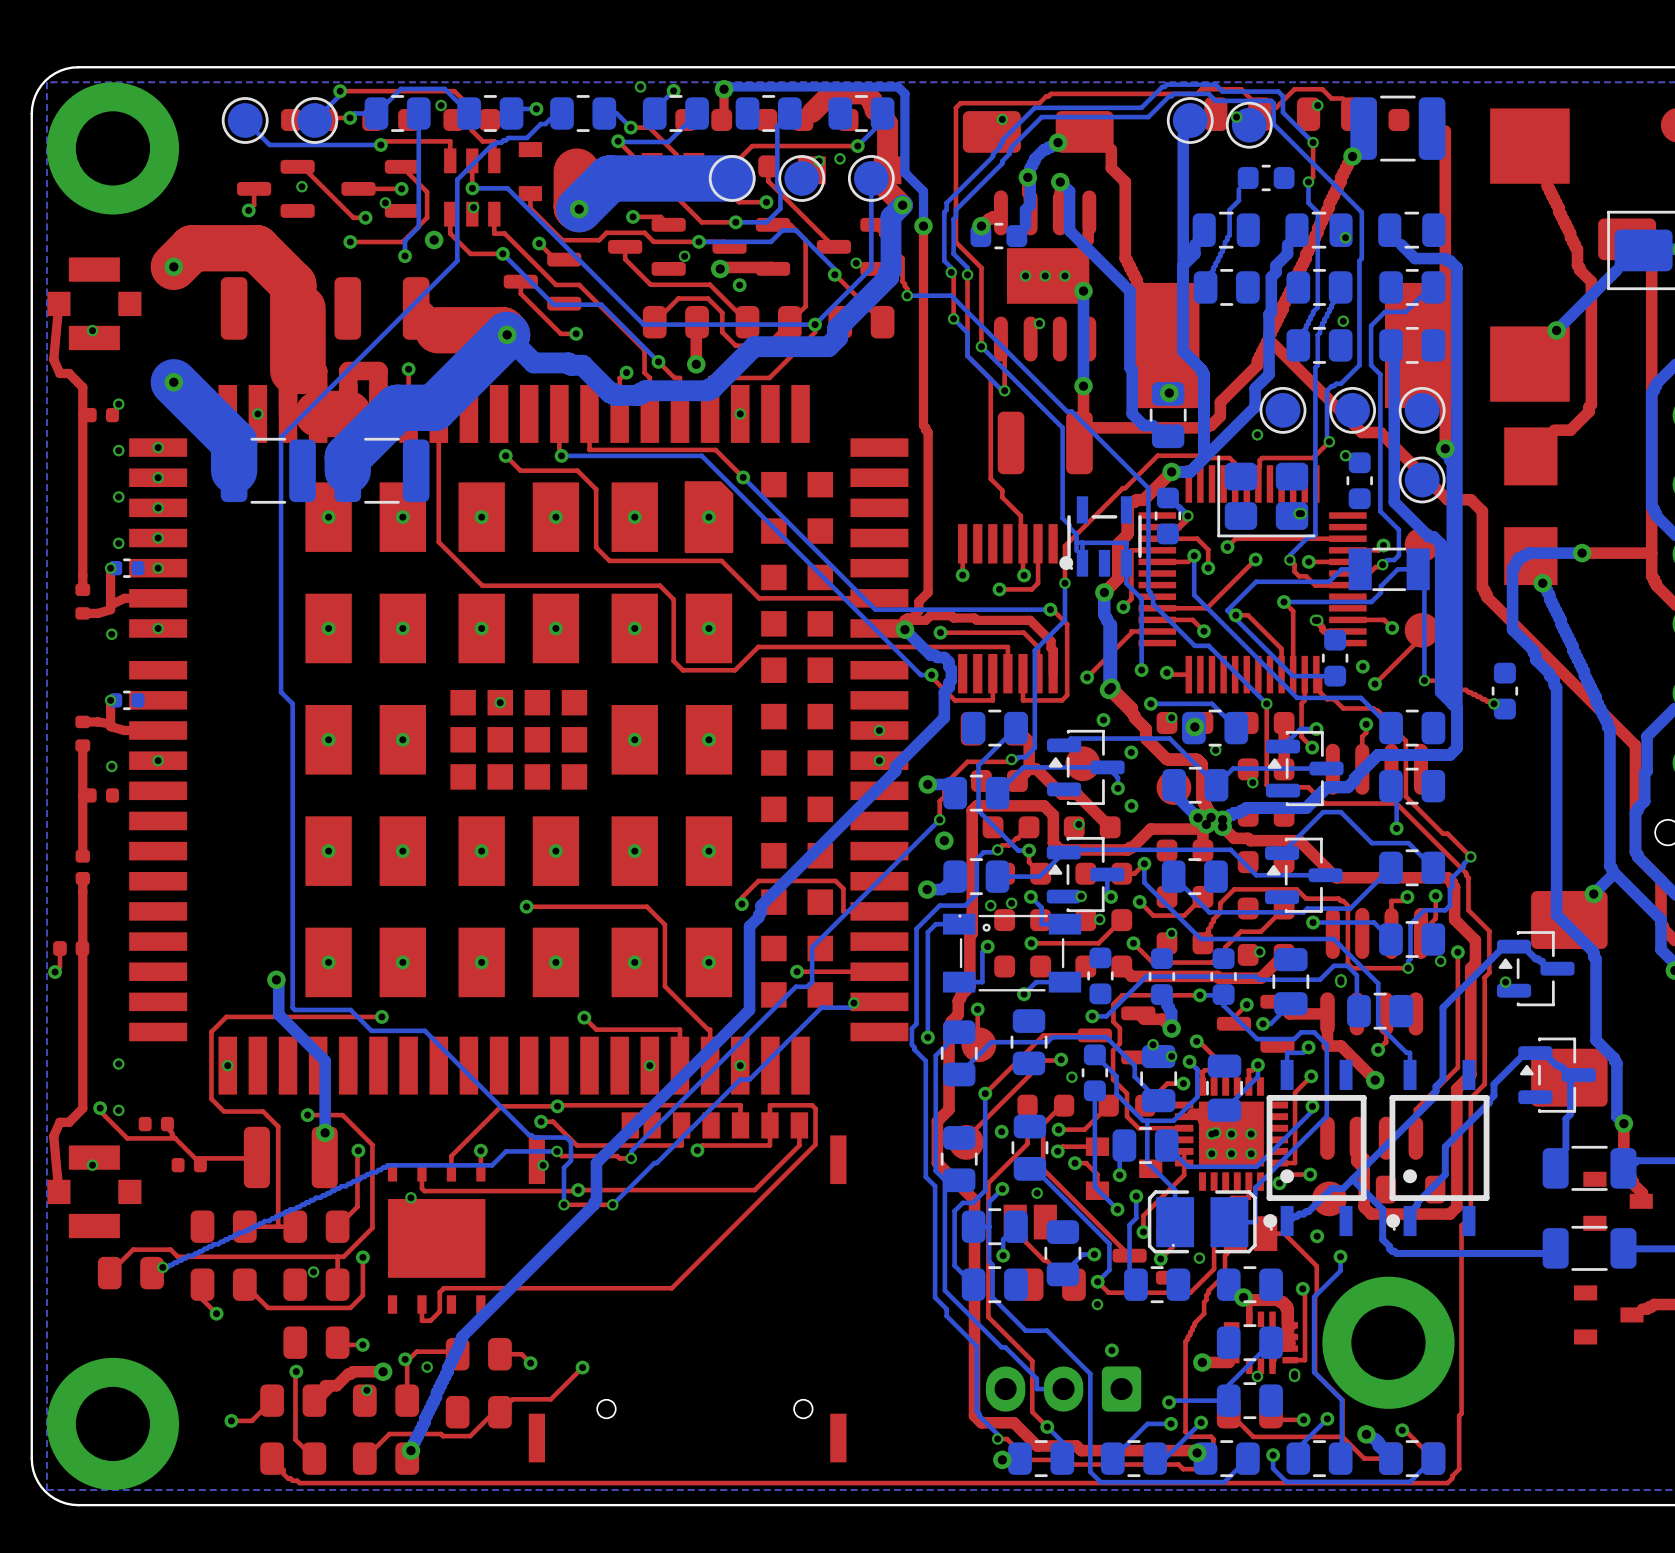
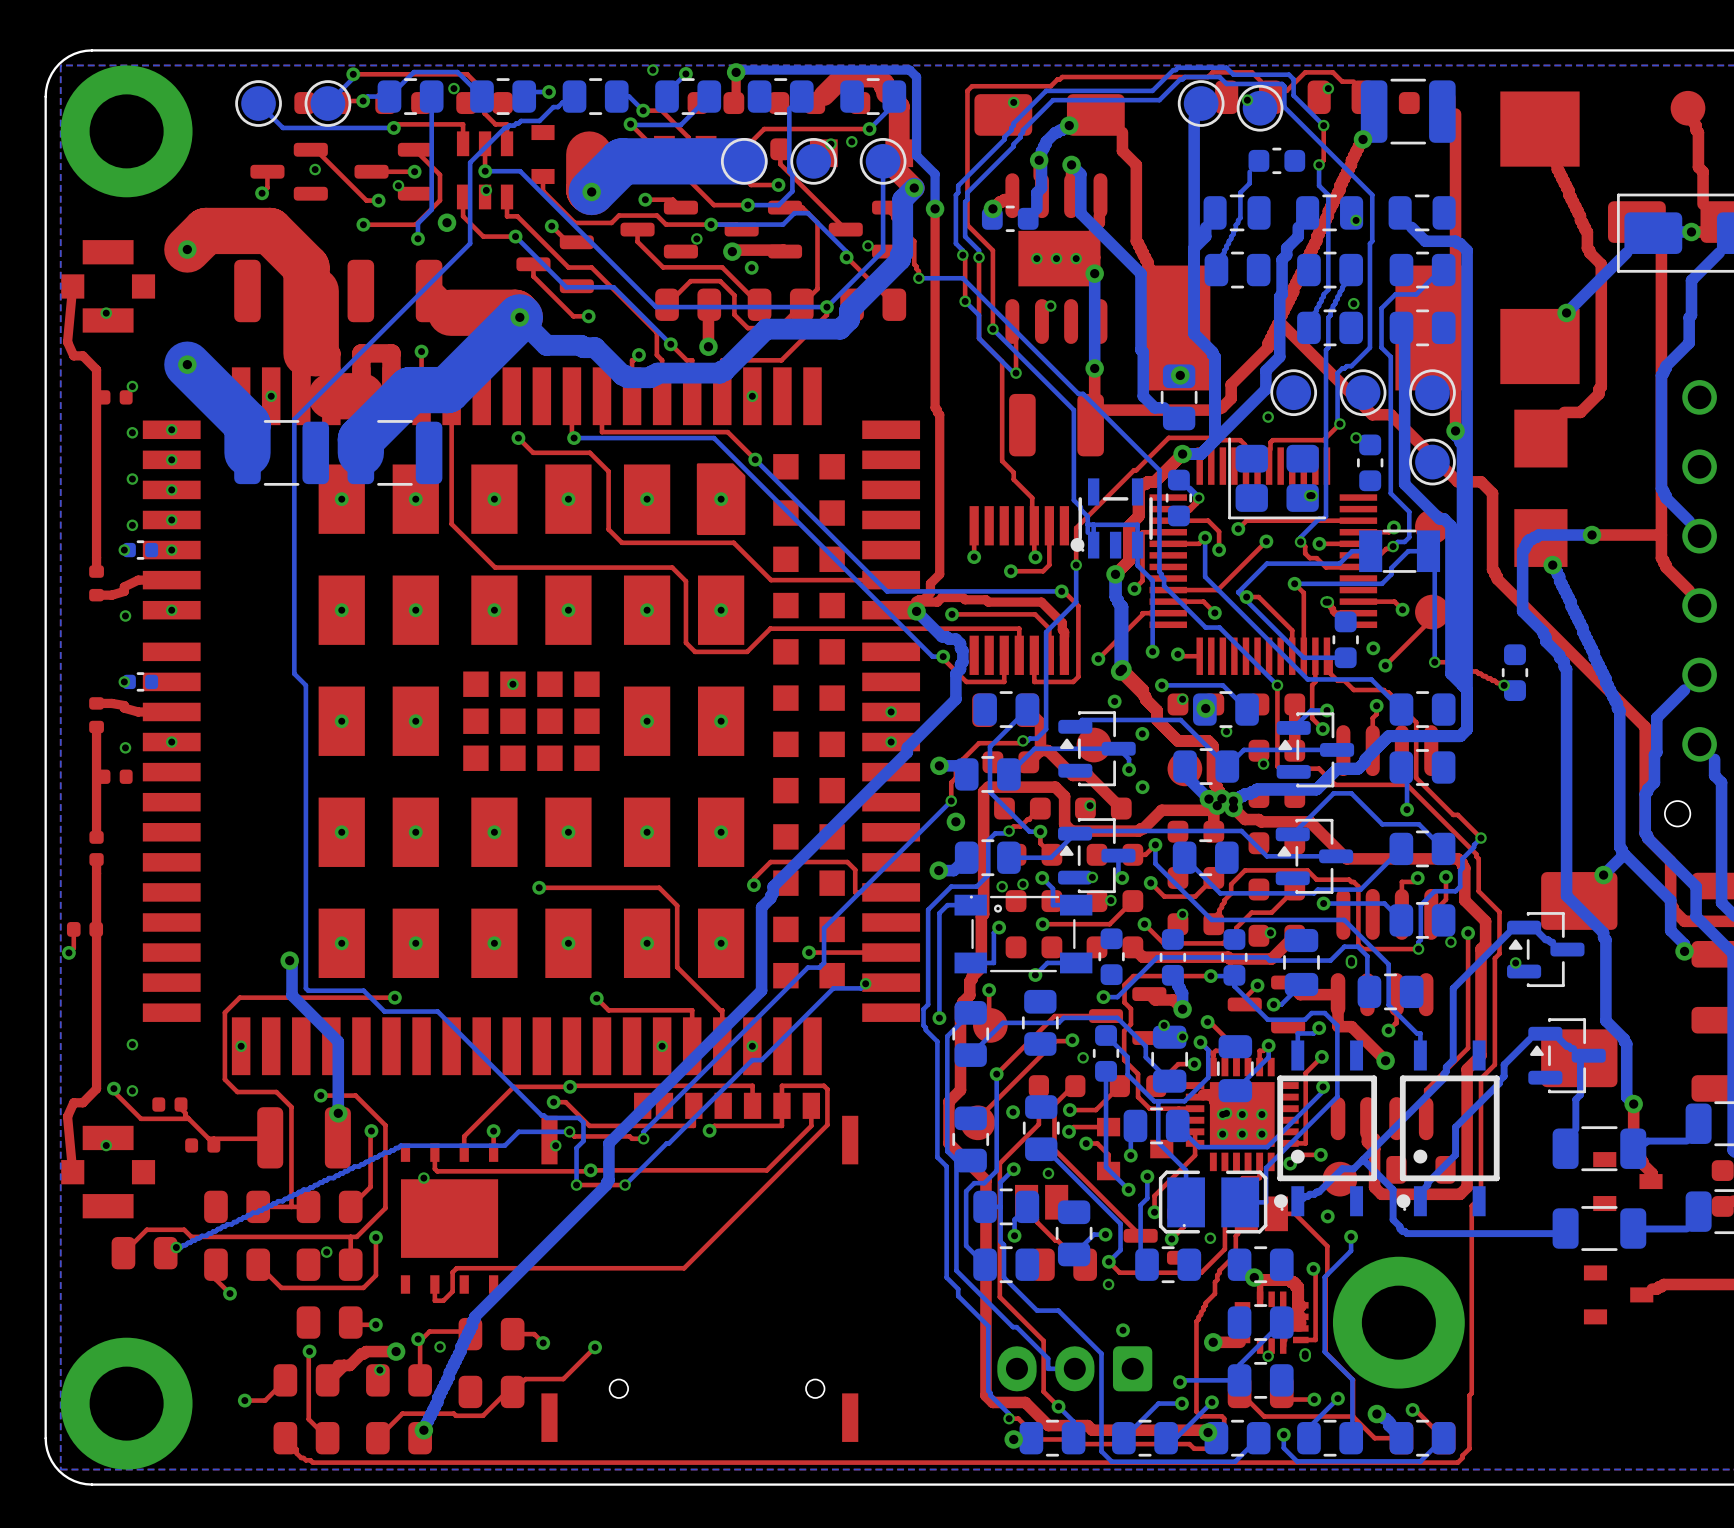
top track: (110, 568) (110, 605) -> none
top track: (110, 700) (110, 724) -> none

